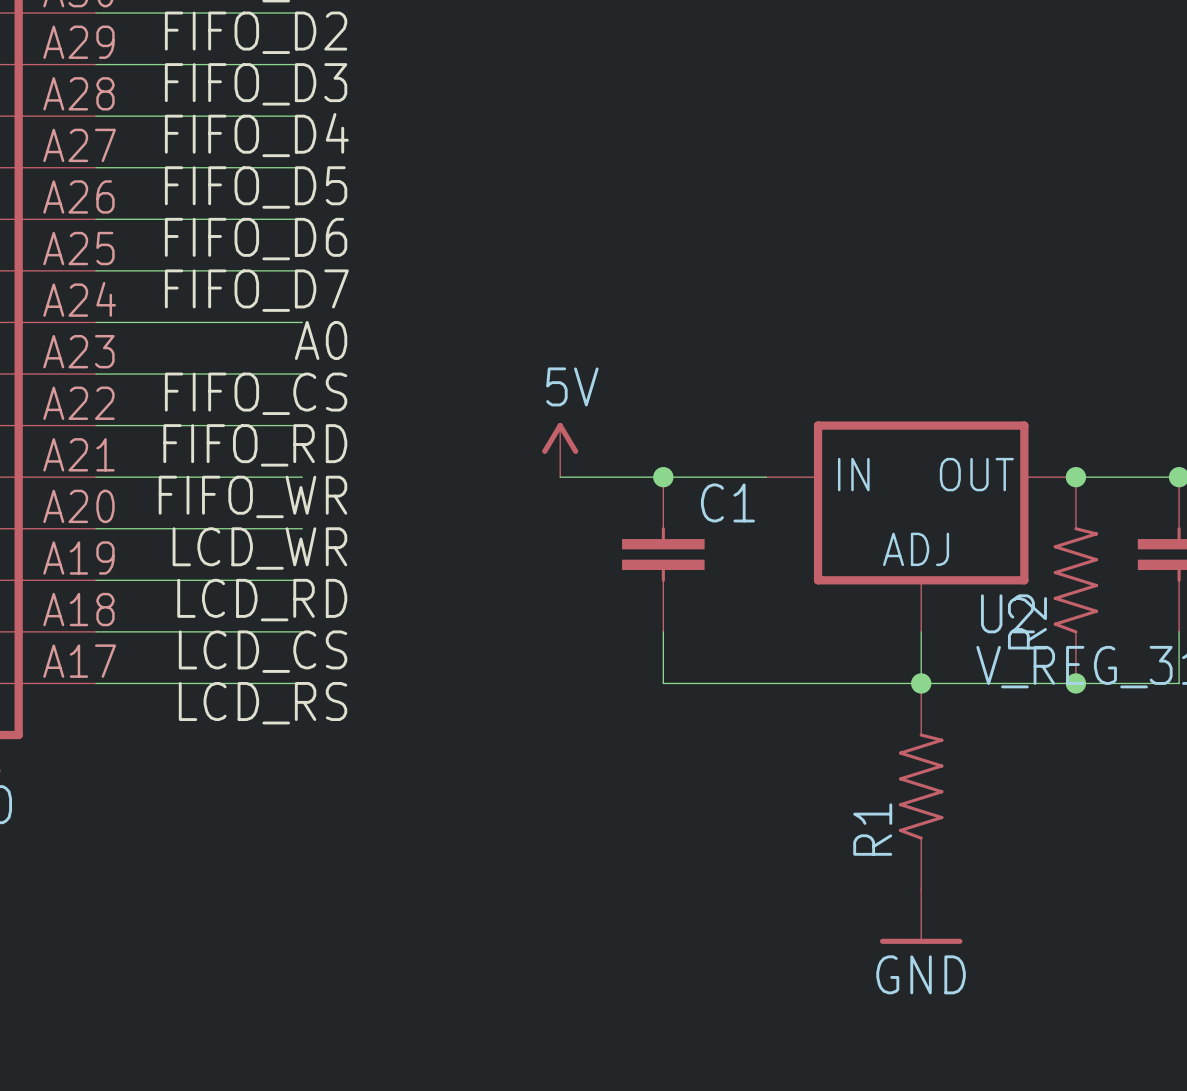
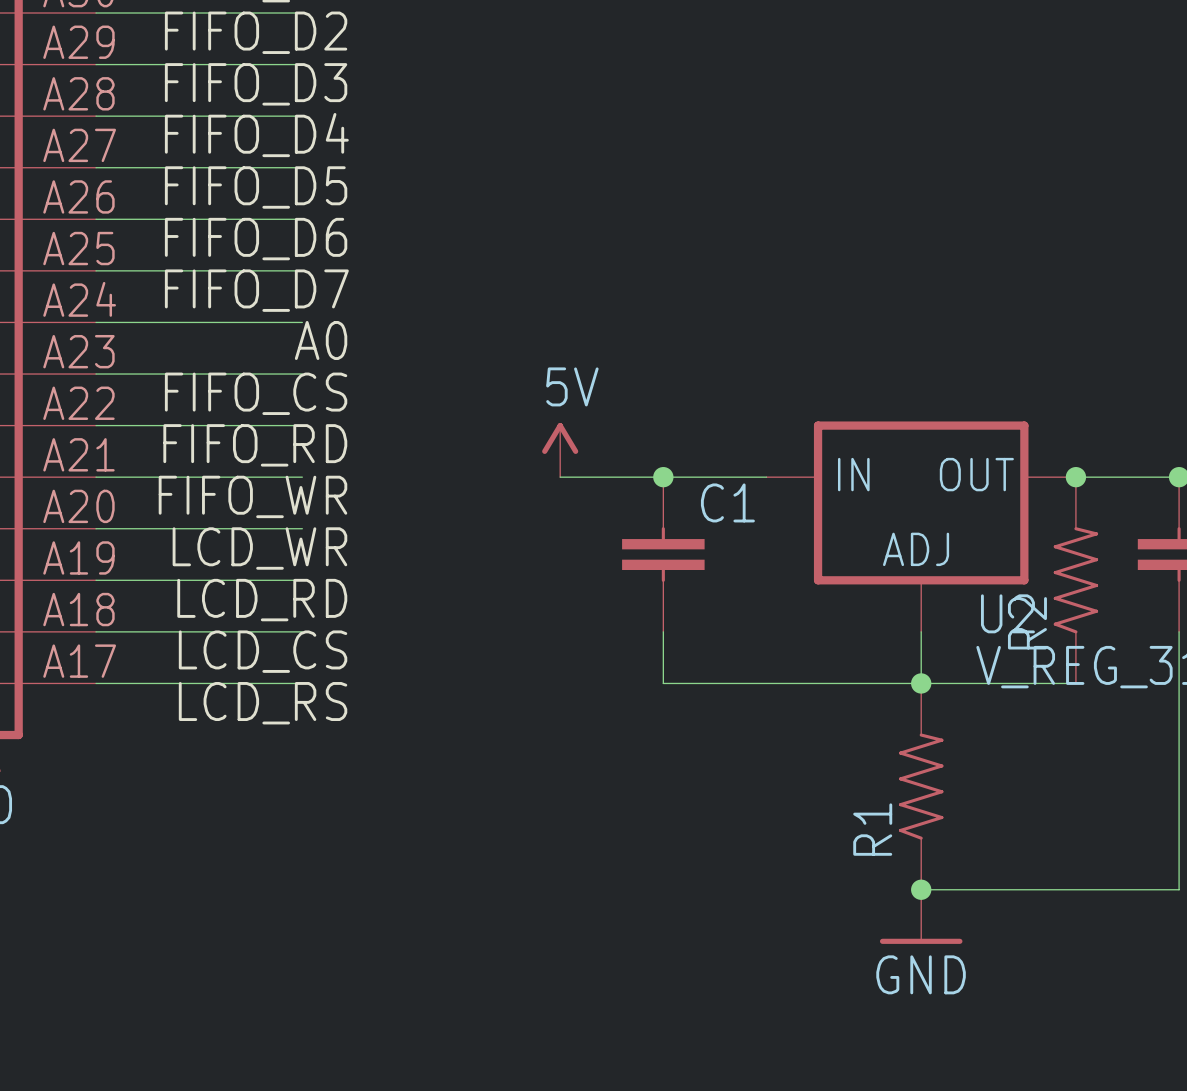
wire: (1075, 683) (1179, 683) -> (921, 889) (1179, 889) (1179, 683)
junction: (1075, 683) -> none
junction: none -> (921, 889)

